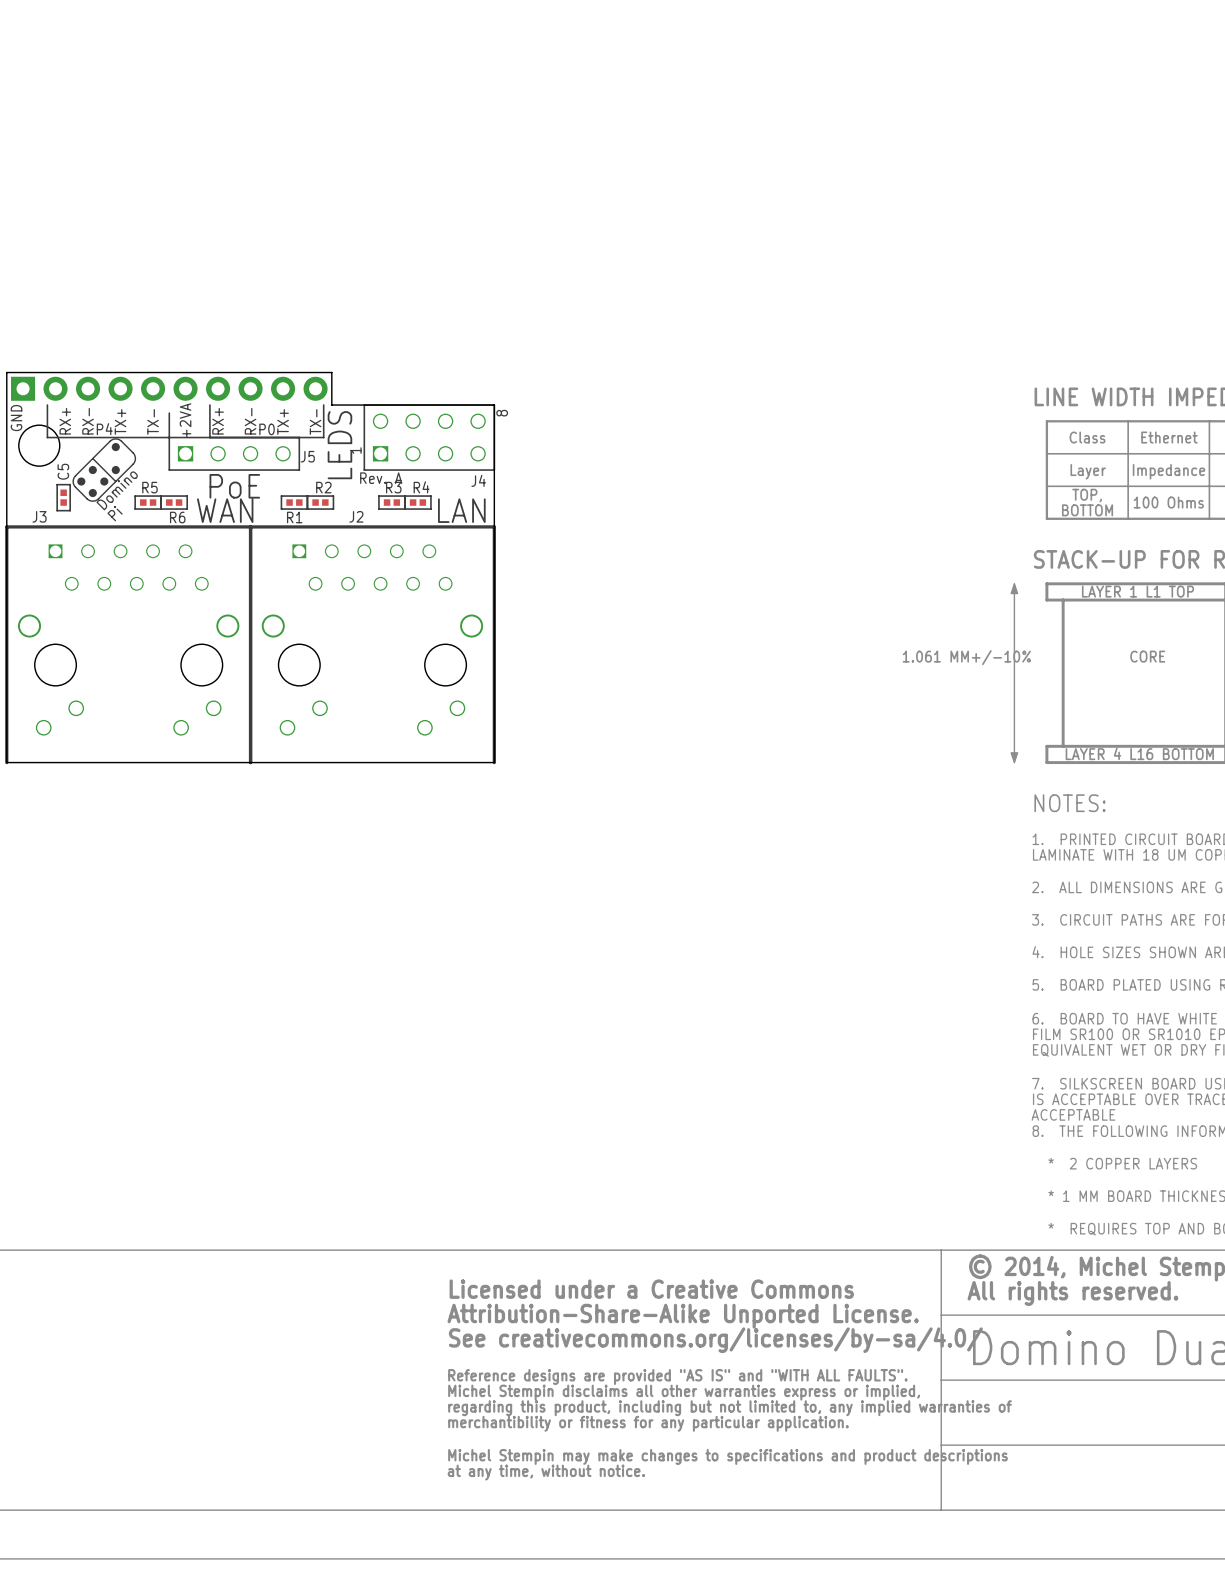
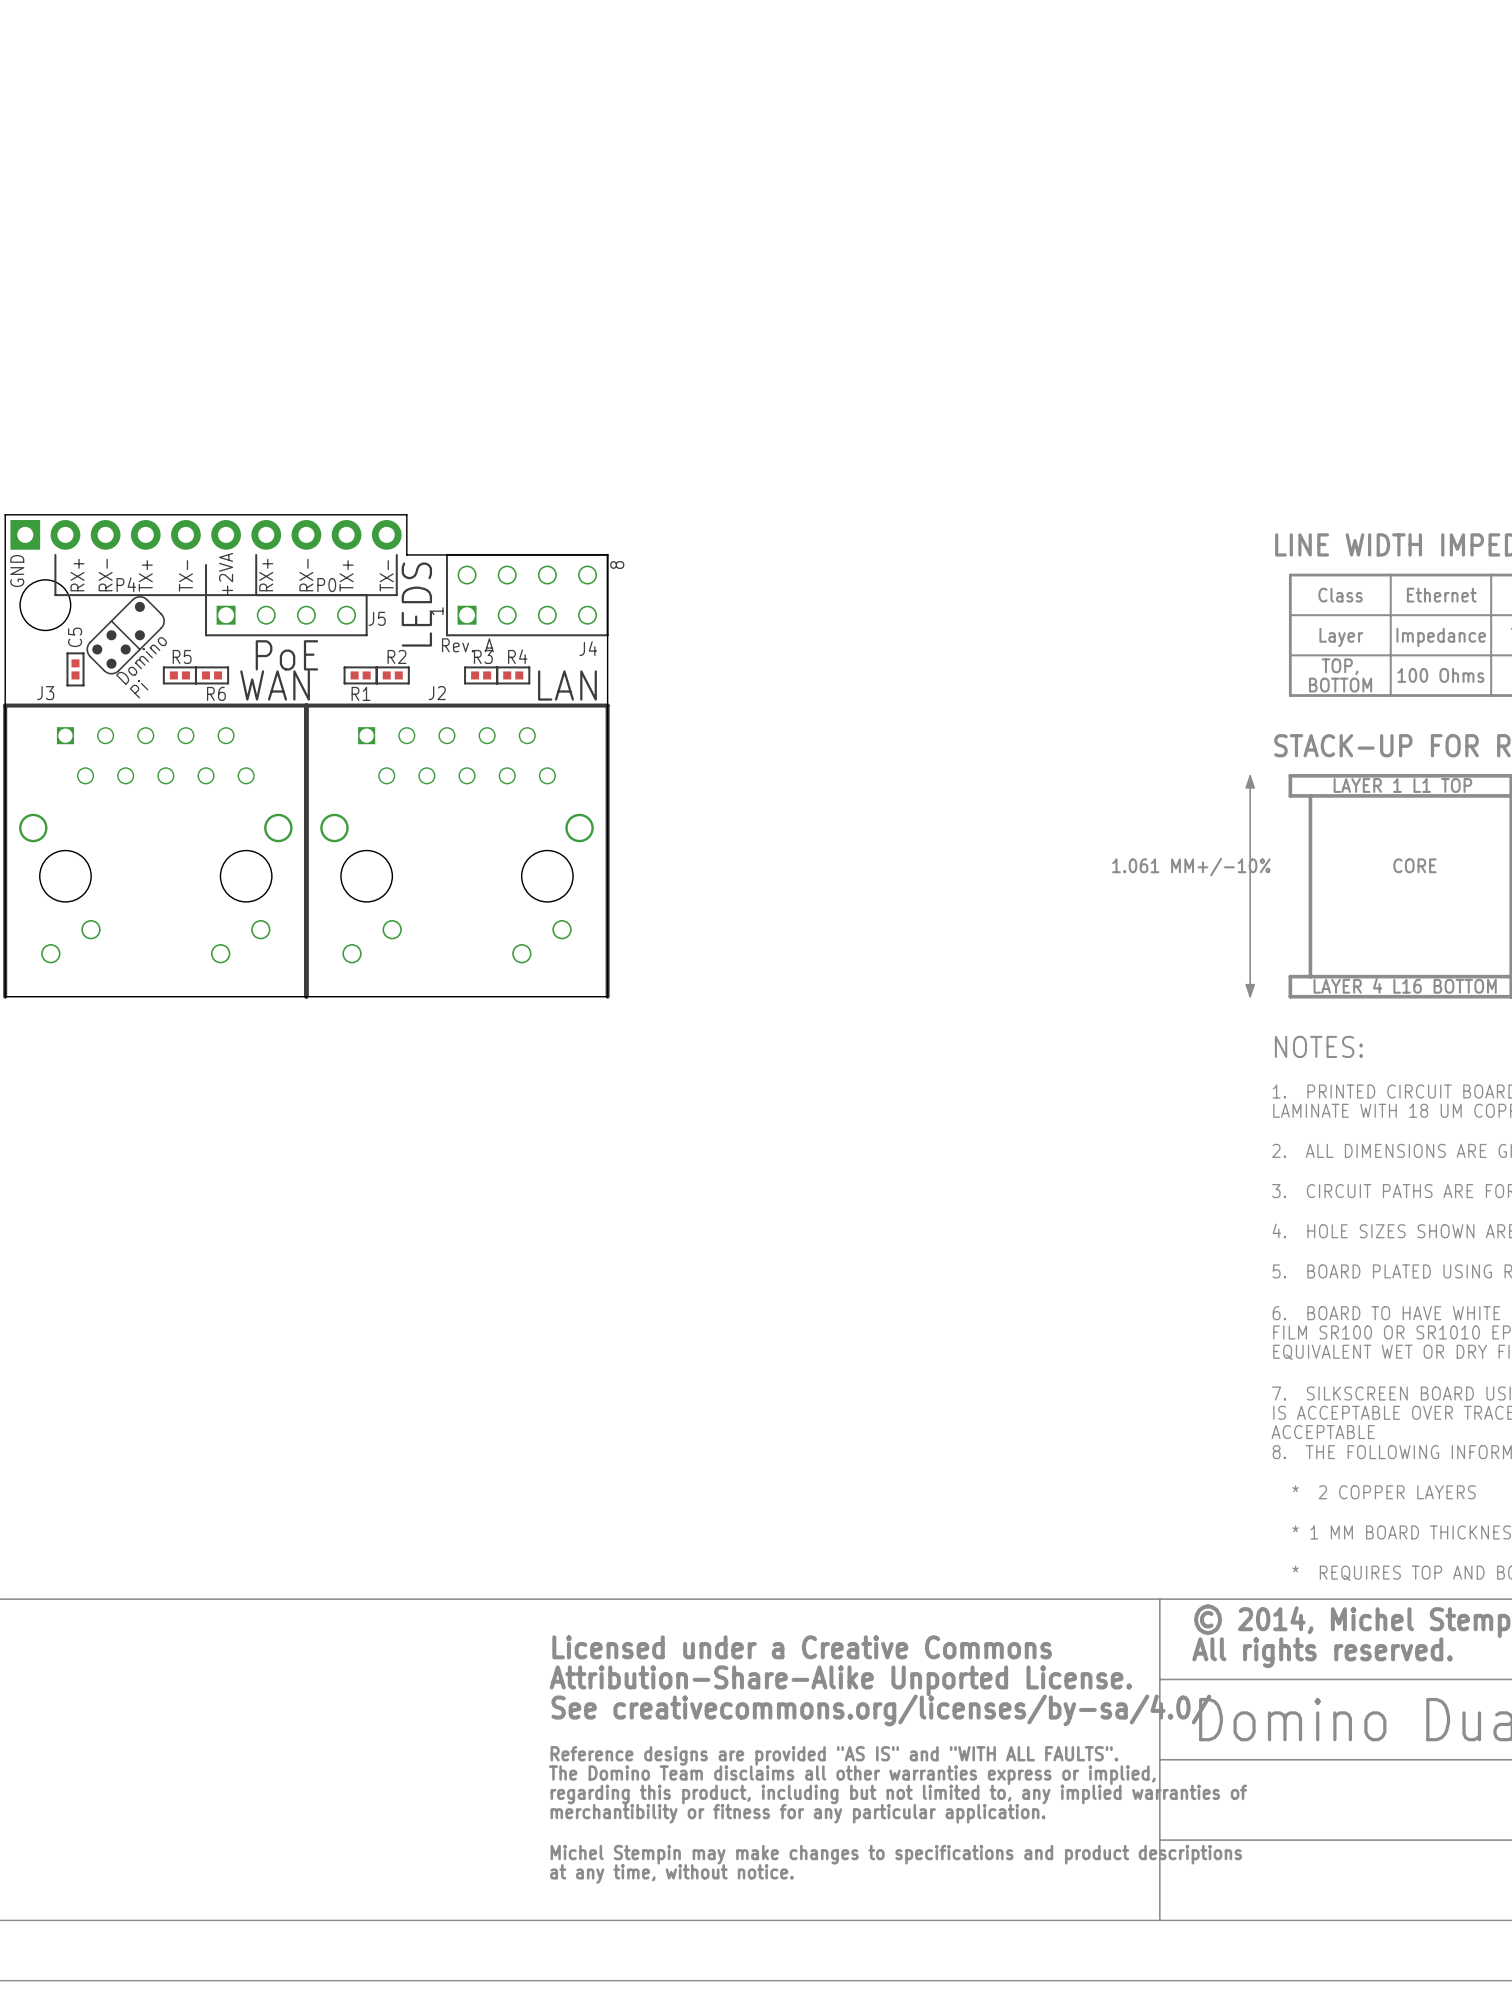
text: Michel Stempin disclaims all other warranties express or implied, (684, 1392) -> The Domino Team disclaims all other warranties express or implied, (852, 1775)

